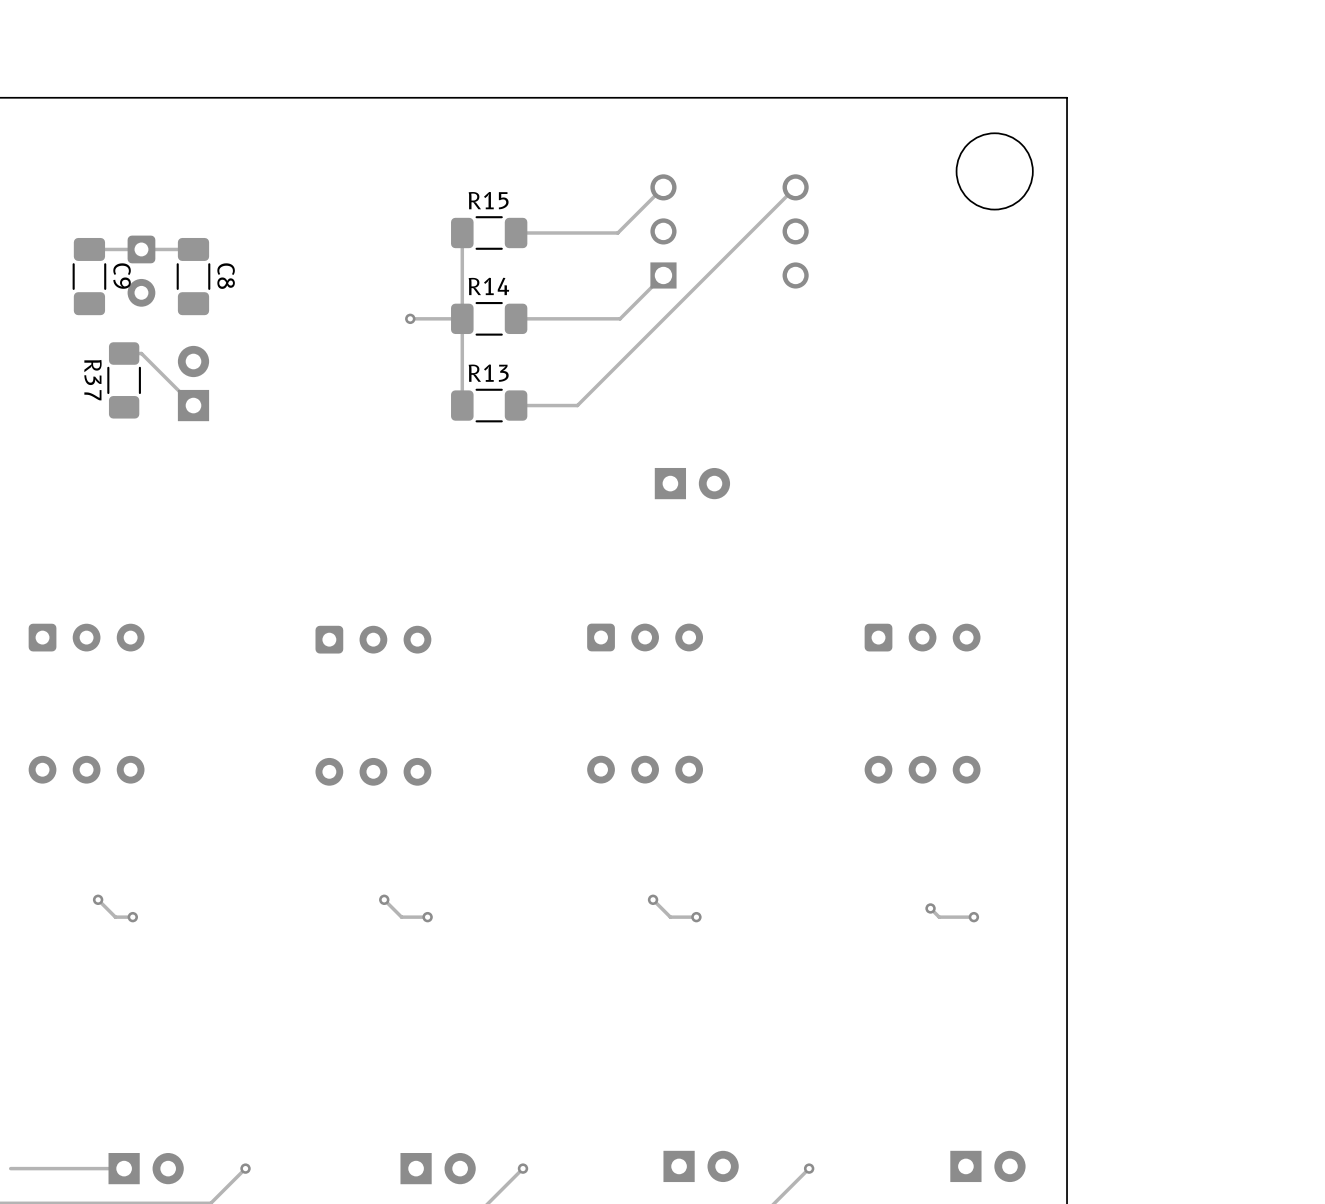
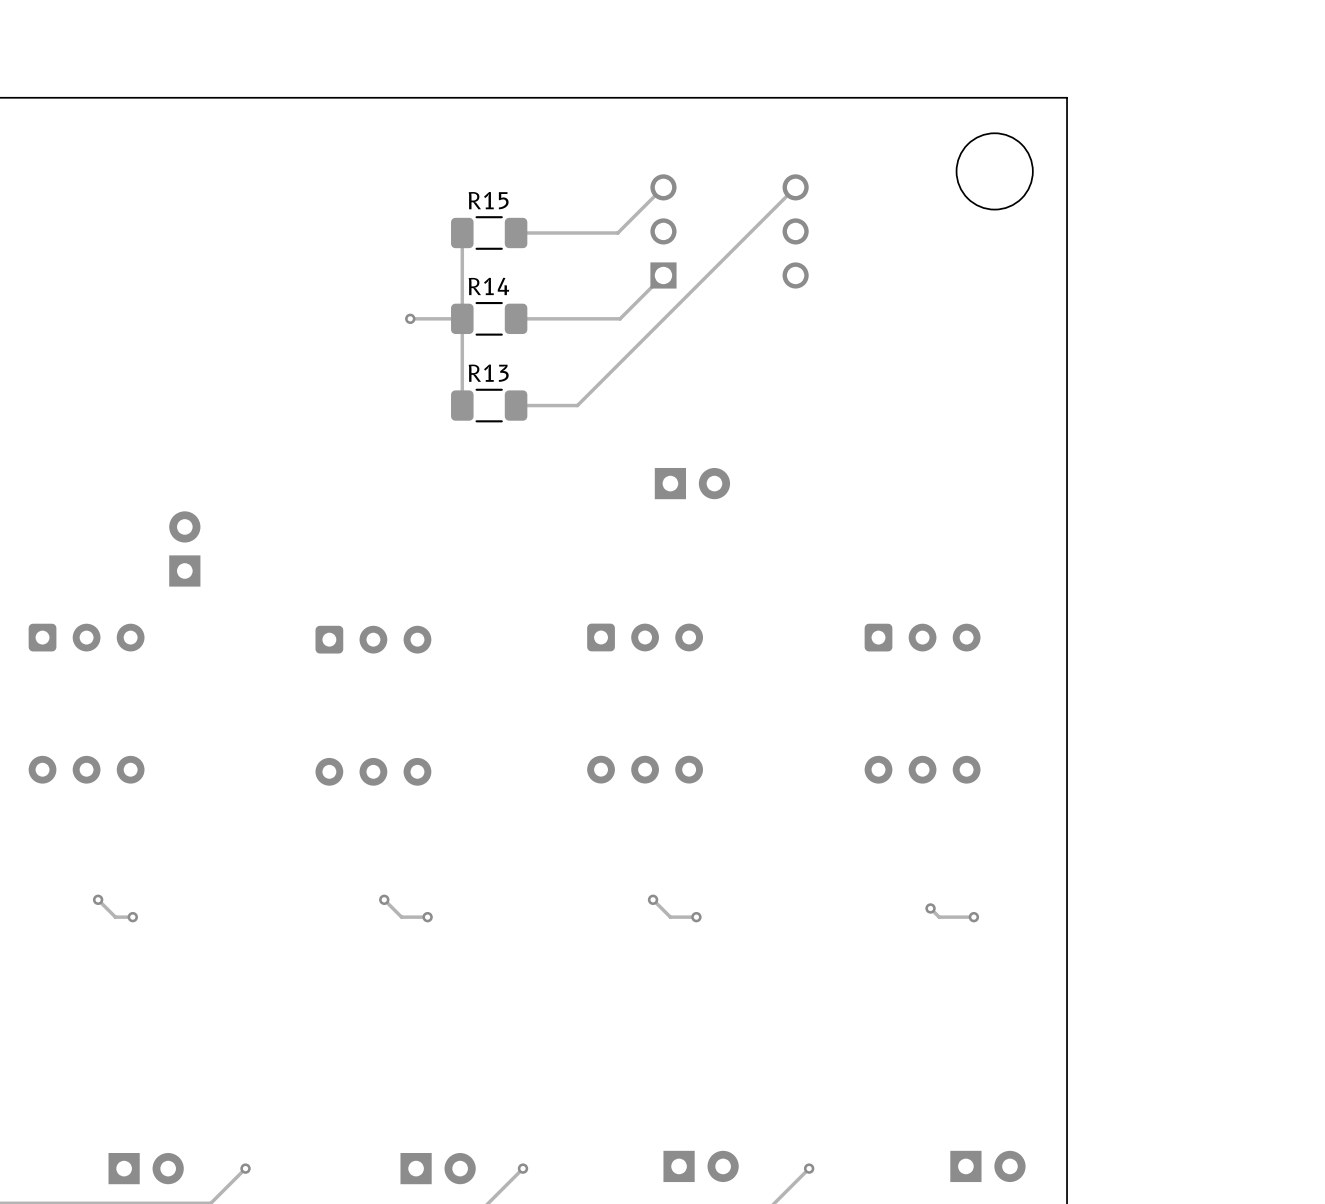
track: (193, 249) (89, 249) -> none
part: (141, 271) -> none
C9: (89, 276) -> none
C8: (193, 276) -> none
track: (124, 353) (141, 353) (193, 405) -> none
R37: (124, 380) -> none
part position: (193, 383) -> (184, 548)
track: (124, 1168) (10, 1168) -> none

